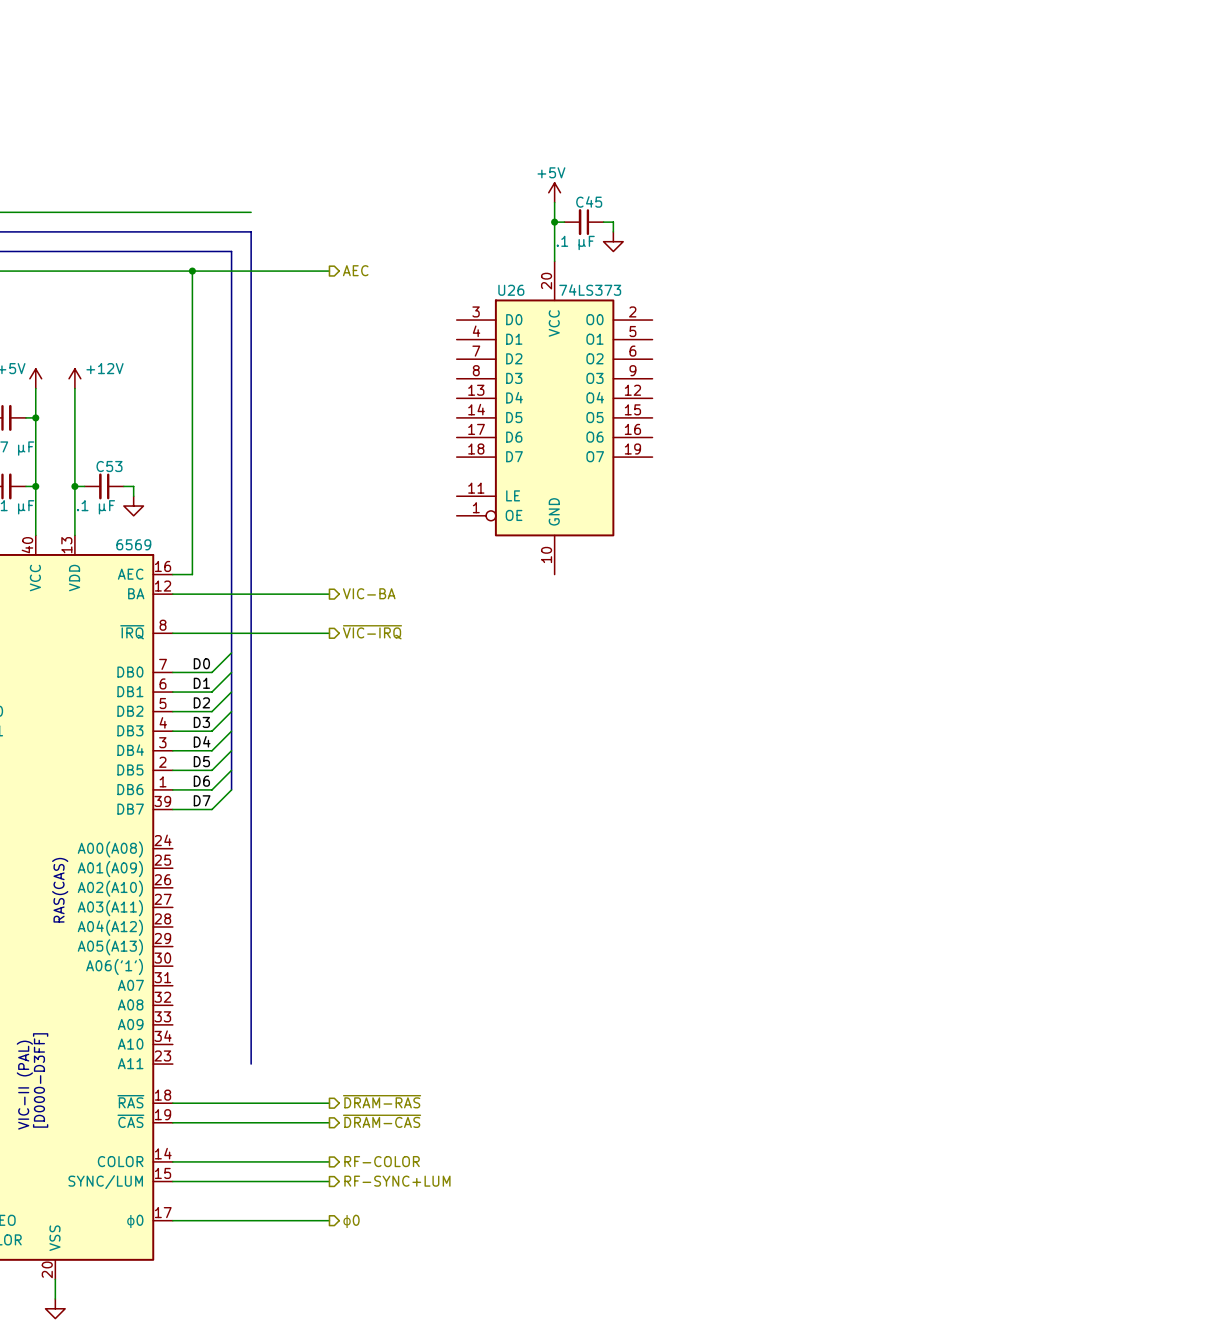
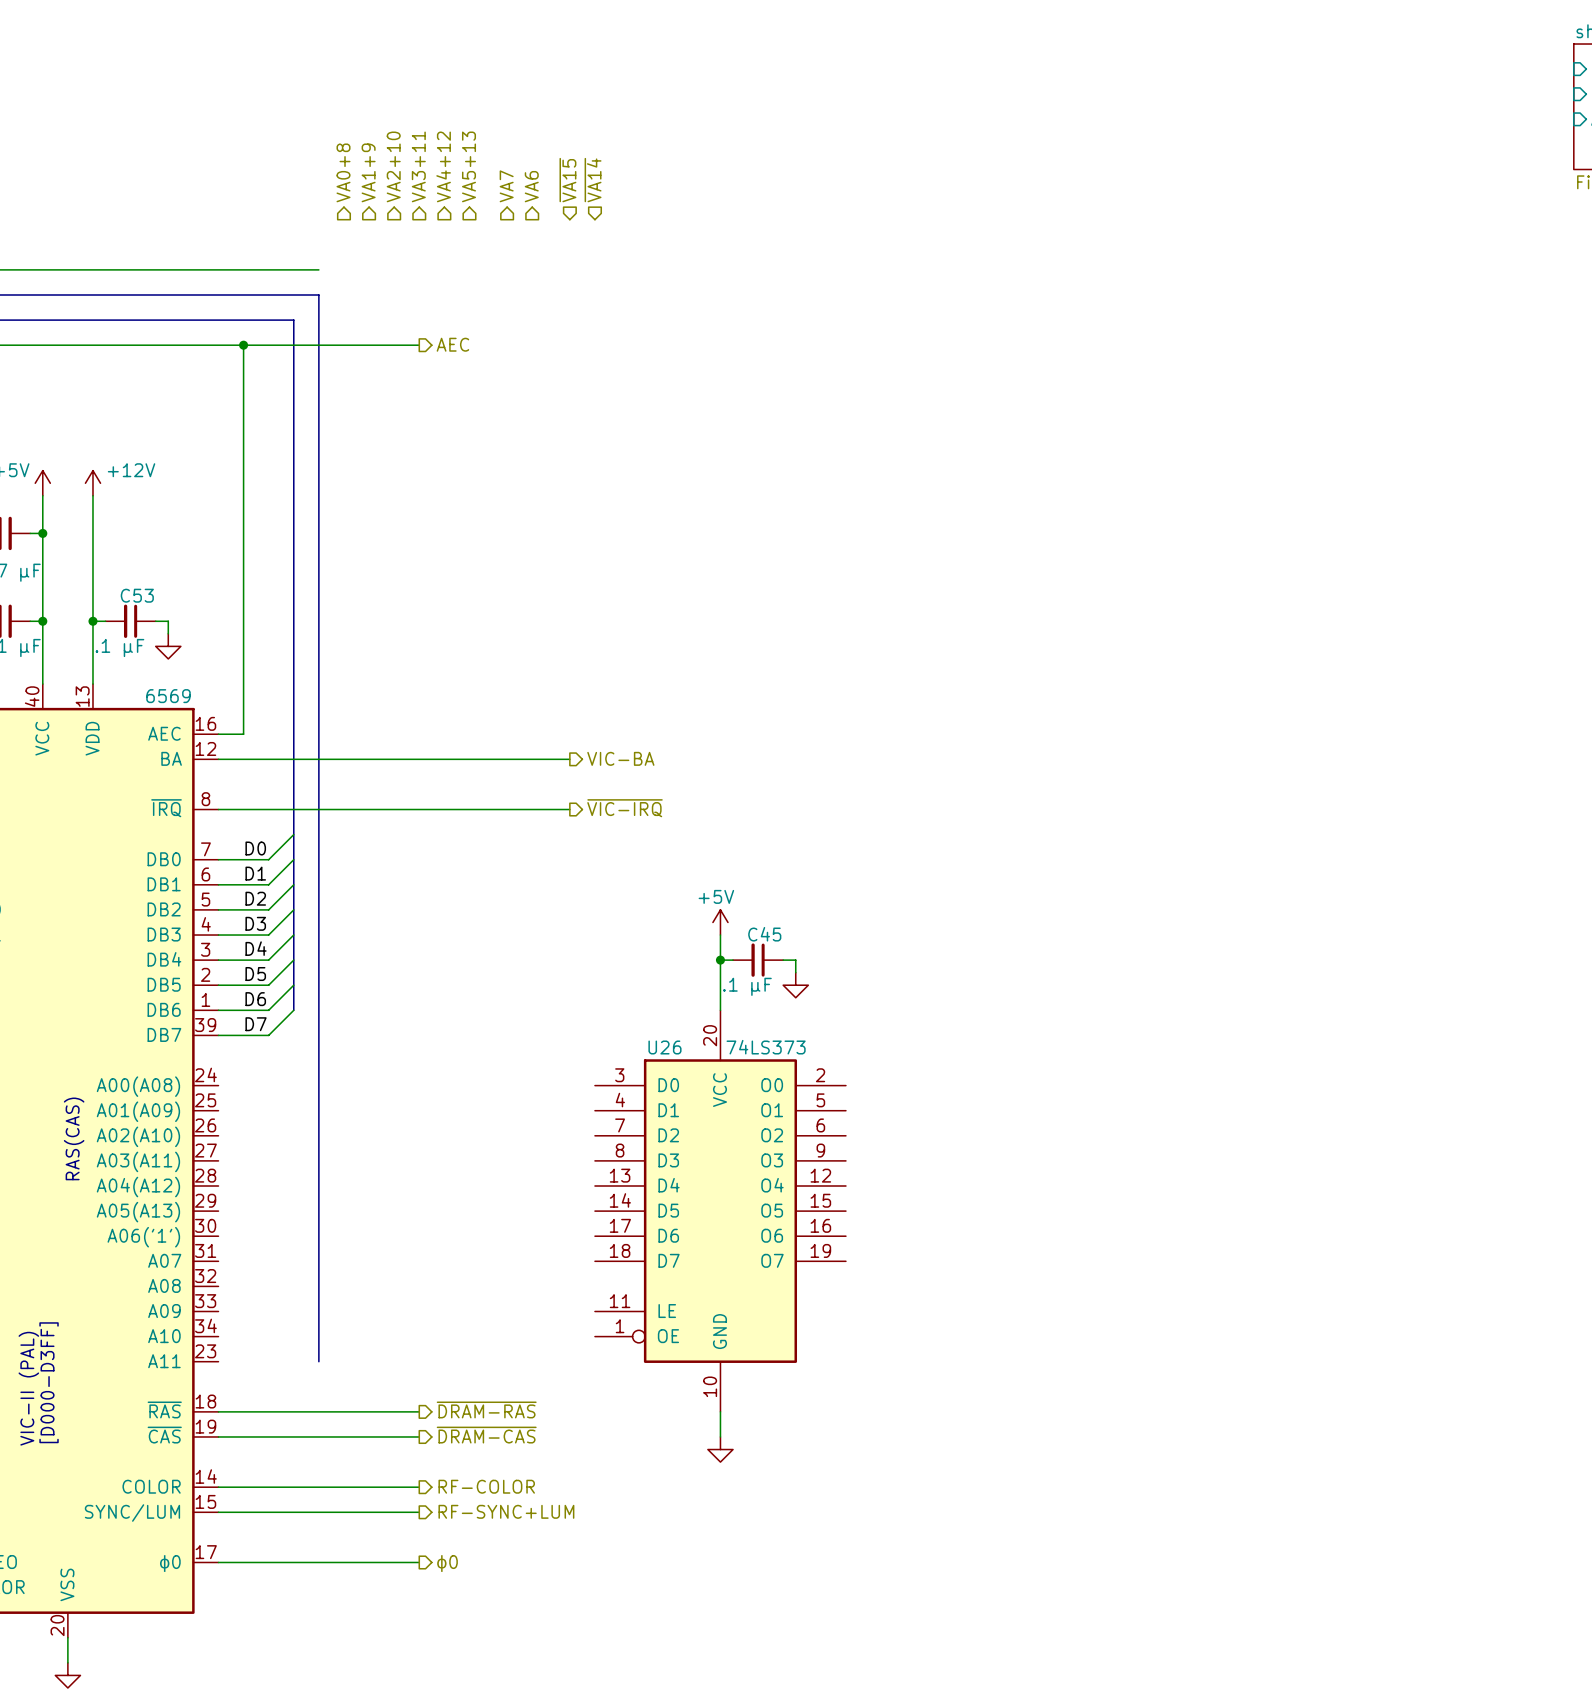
hierarchical label: none -> VA2+10 (393, 166)
hierarchical label: none -> VA3+11 (418, 166)
hierarchical label: none -> VA4+12 (443, 166)
hierarchical label: none -> VA5+13 (469, 166)
hierarchical label: none -> VA0+8 (343, 172)
hierarchical label: none -> VA1+9 (368, 172)
hierarchical label: none -> ~{VA15} (567, 180)
hierarchical label: none -> ~{VA14} (593, 180)
hierarchical label: none -> VA7 (506, 186)
hierarchical label: none -> VA6 (531, 186)
power symbol: +5V (554, 192) -> none
wire: (554, 202) (554, 261) -> none
wire: (554, 222) (564, 222) -> none
junction: (554, 222) -> none
C45 position: (583, 222) -> (758, 960)
wire: (603, 222) (613, 222) (613, 231) -> none
power symbol: (613, 241) -> none
U26 position: (554, 417) -> (720, 1211)
hierarchical label position: VIC-BA (369, 593) -> VIC-BA (620, 758)
wire: none -> (419, 759) (569, 759)
hierarchical label position: ~{VIC-IRQ} (372, 632) -> ~{VIC-IRQ} (625, 808)
wire: none -> (419, 809) (569, 809)
power symbol: none -> +5V (720, 922)
wire: none -> (720, 935) (720, 1010)
wire: none -> (720, 960) (733, 960)
junction: none -> (720, 960)
wire: none -> (783, 960) (795, 960) (795, 972)
power symbol: none -> (795, 985)
wire: none -> (720, 1411) (720, 1436)
power symbol: none -> (720, 1449)

